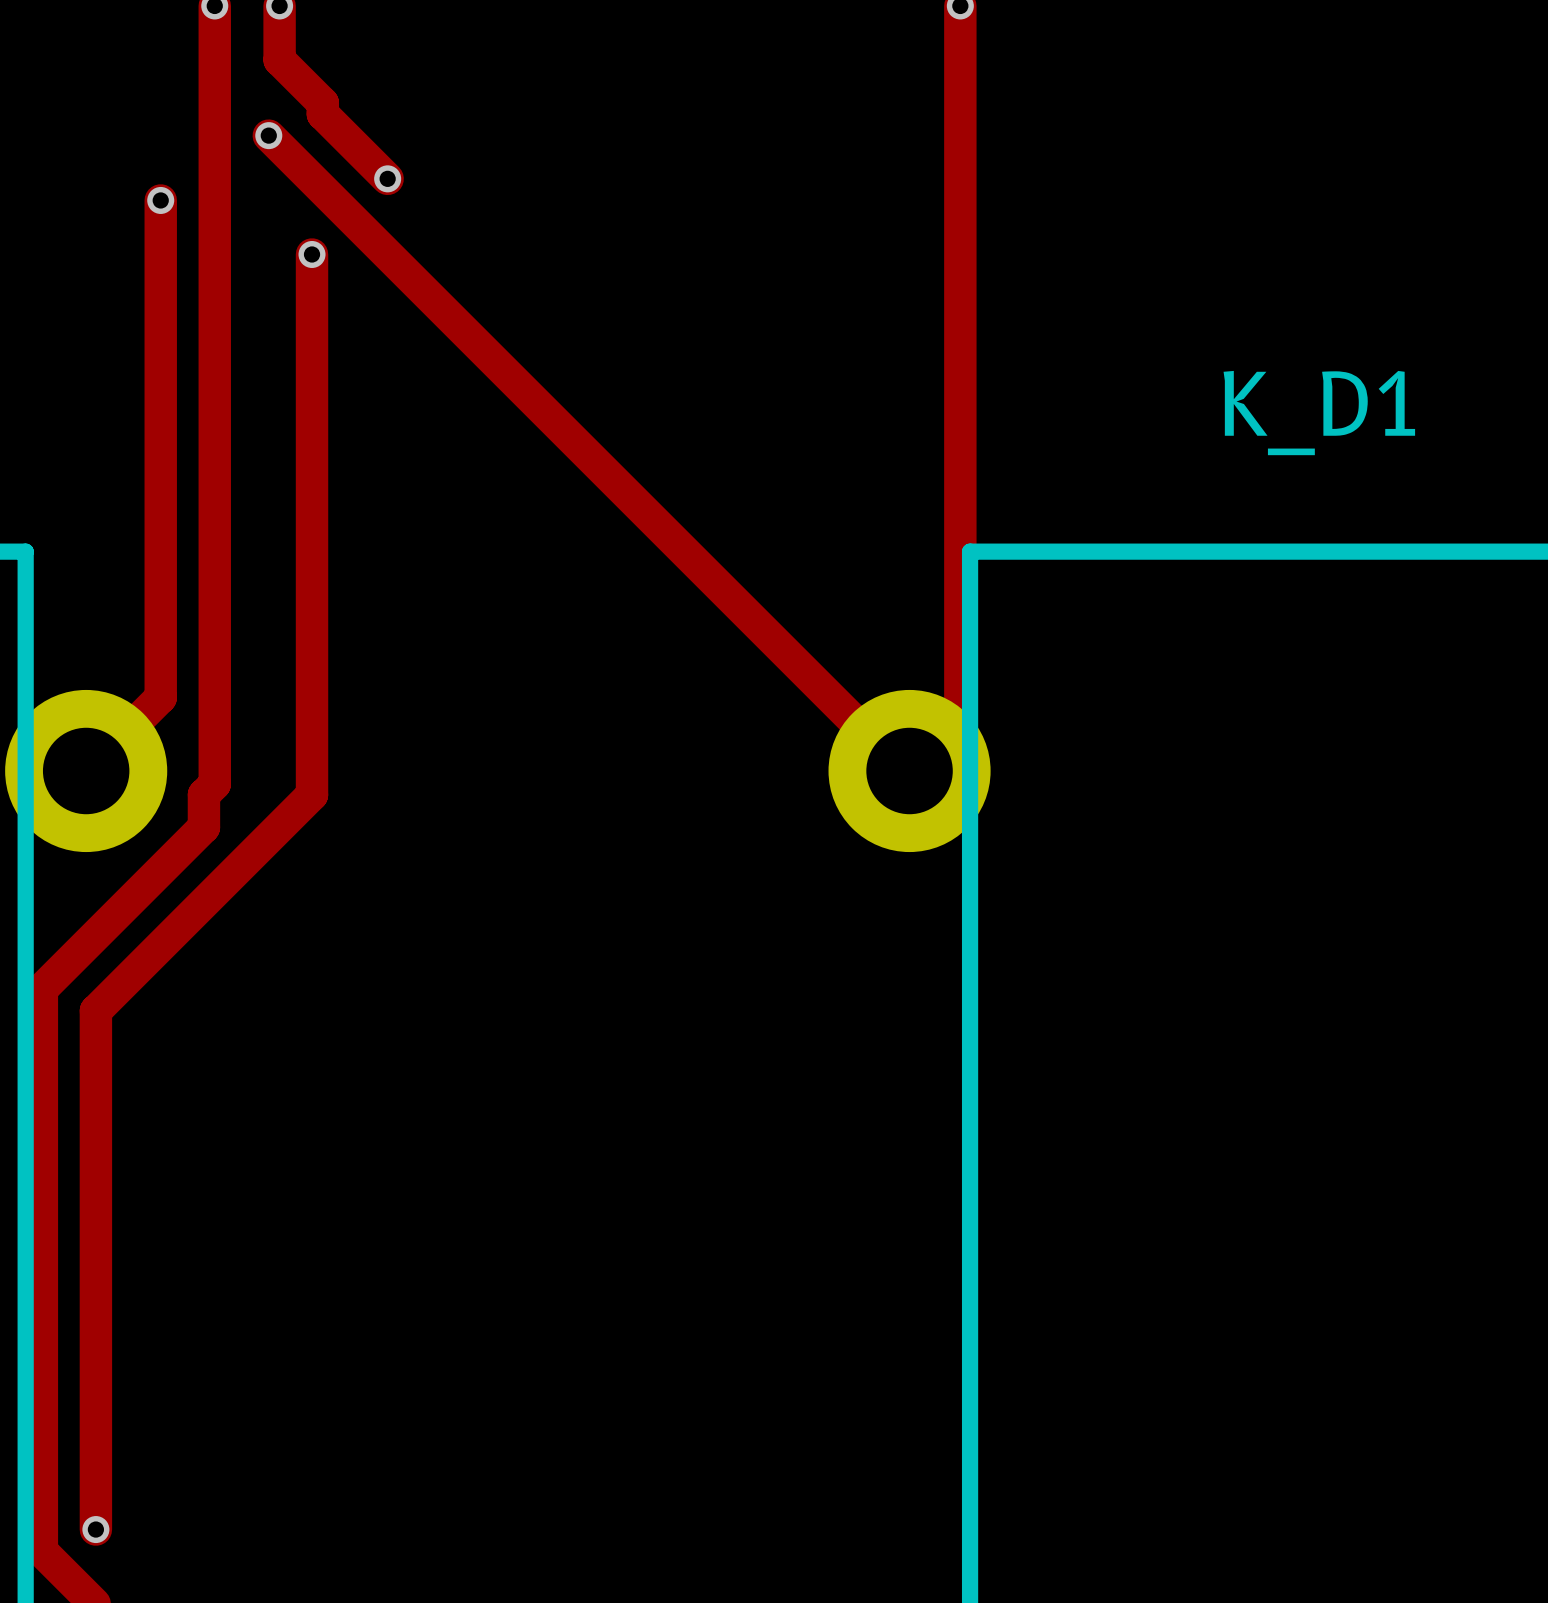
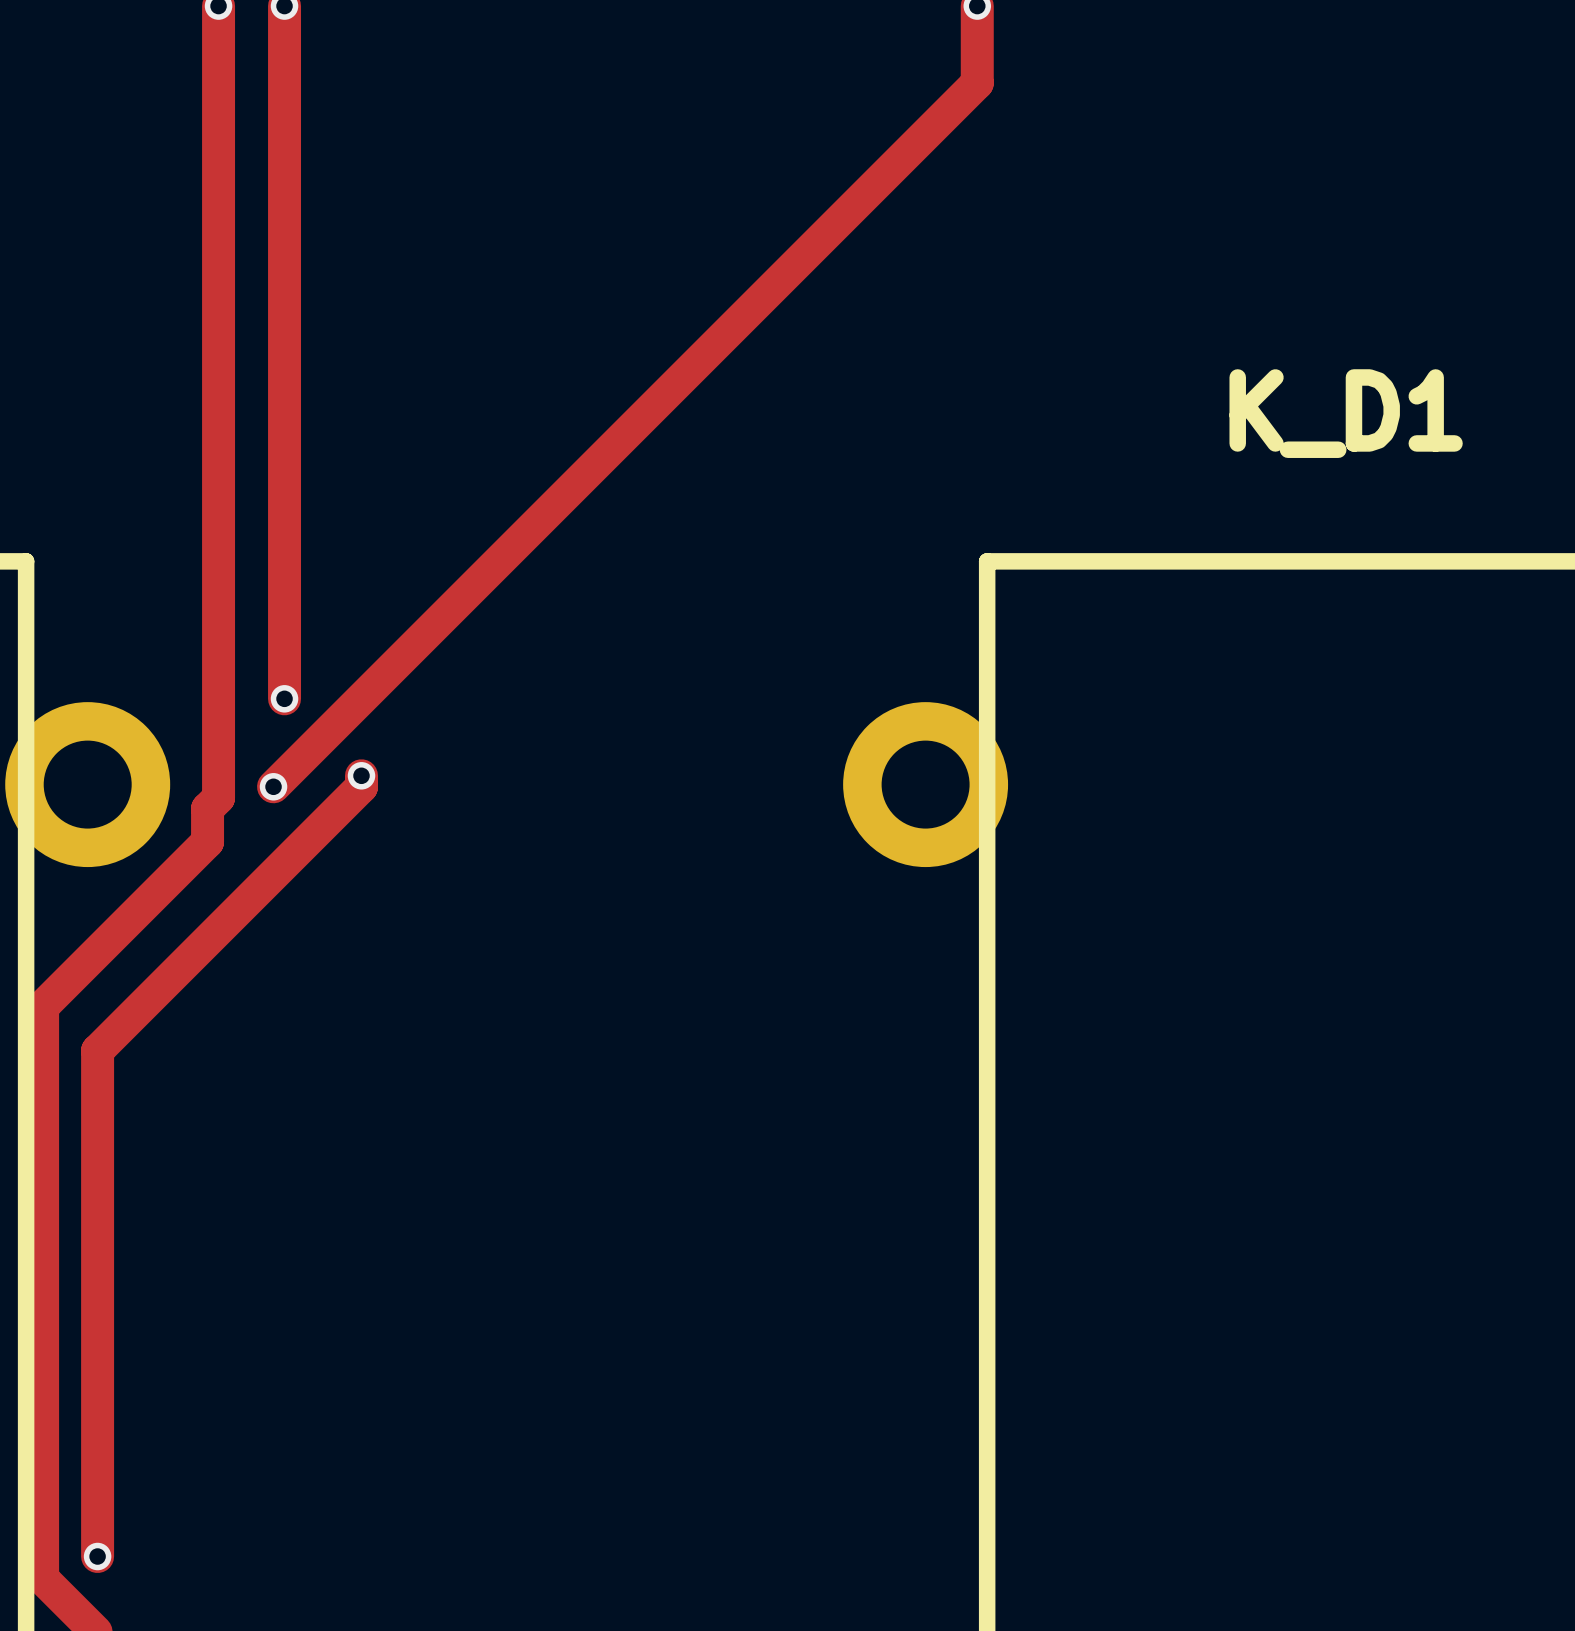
track: (279, 59) (322, 103) (322, 114) (387, 178) -> (284, 61) (284, 698)
track: (960, 81) (960, 719) (906, 773) (268, 135) -> (977, 83) (273, 786)
via: (268, 135) -> none
via: (387, 178) -> none
track: (160, 200) (160, 697) (85, 773) -> none
via: (160, 200) -> none
track: (312, 254) (312, 794) (95, 1010) (95, 1032) -> (361, 775) (361, 786) (97, 1050)
via: (312, 254) -> none
via: none -> (284, 698)
via: none -> (361, 775)
via: none -> (273, 786)

